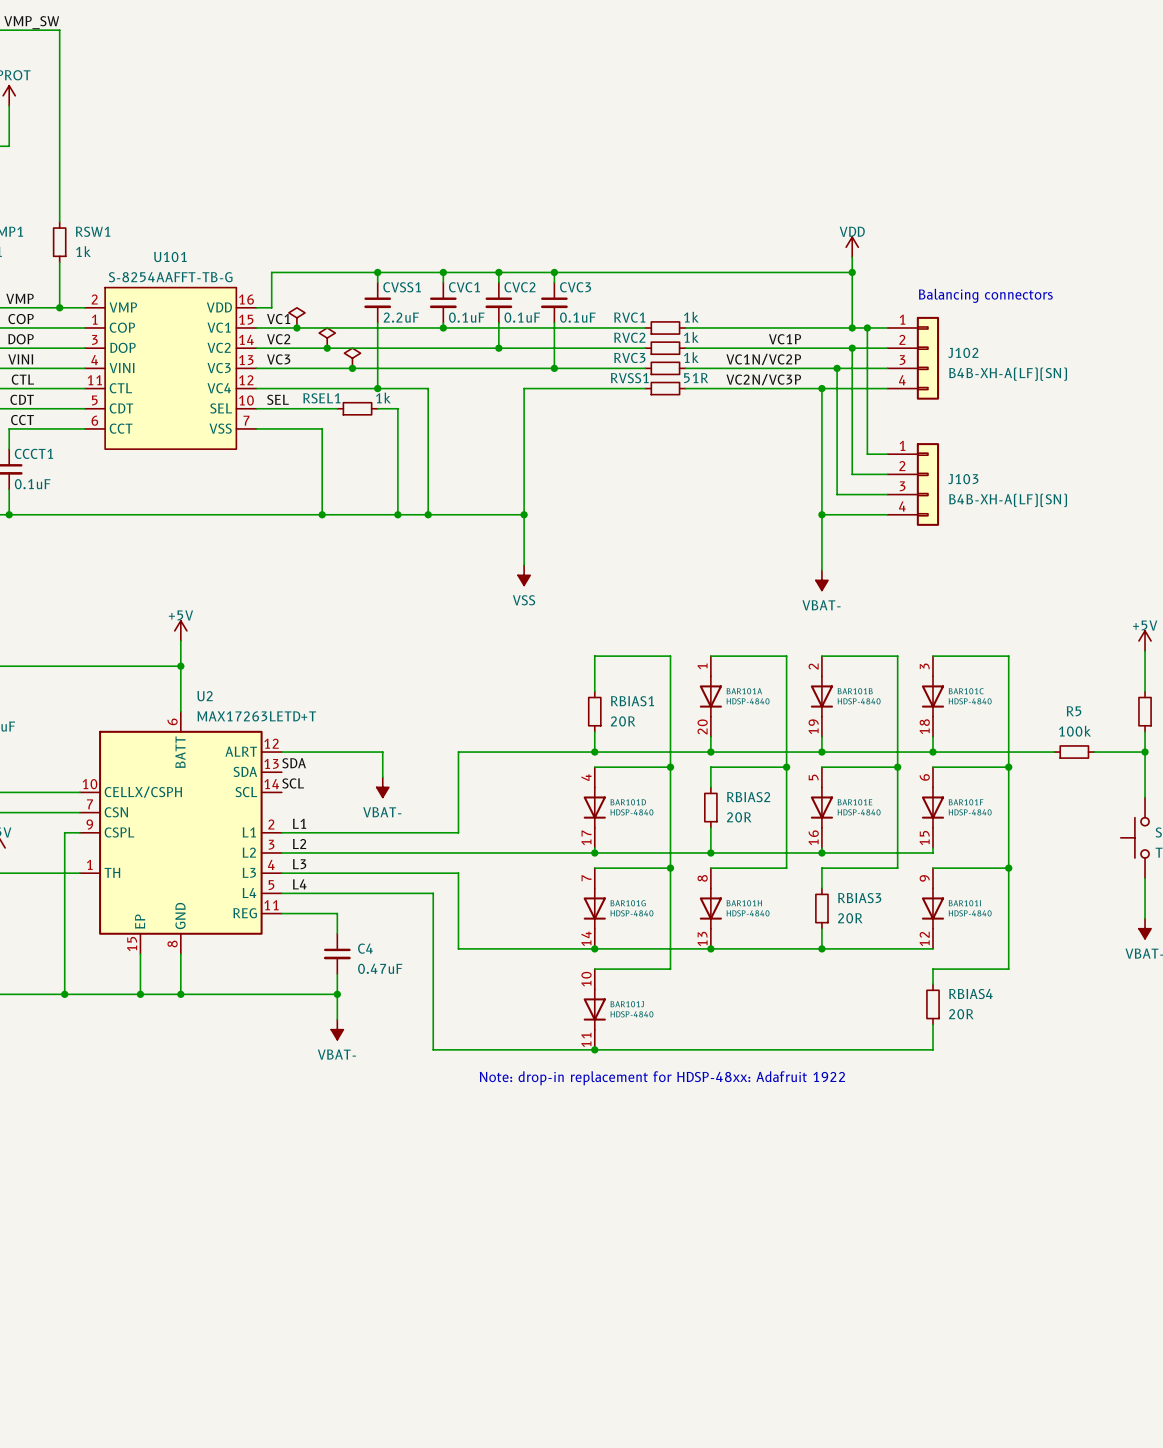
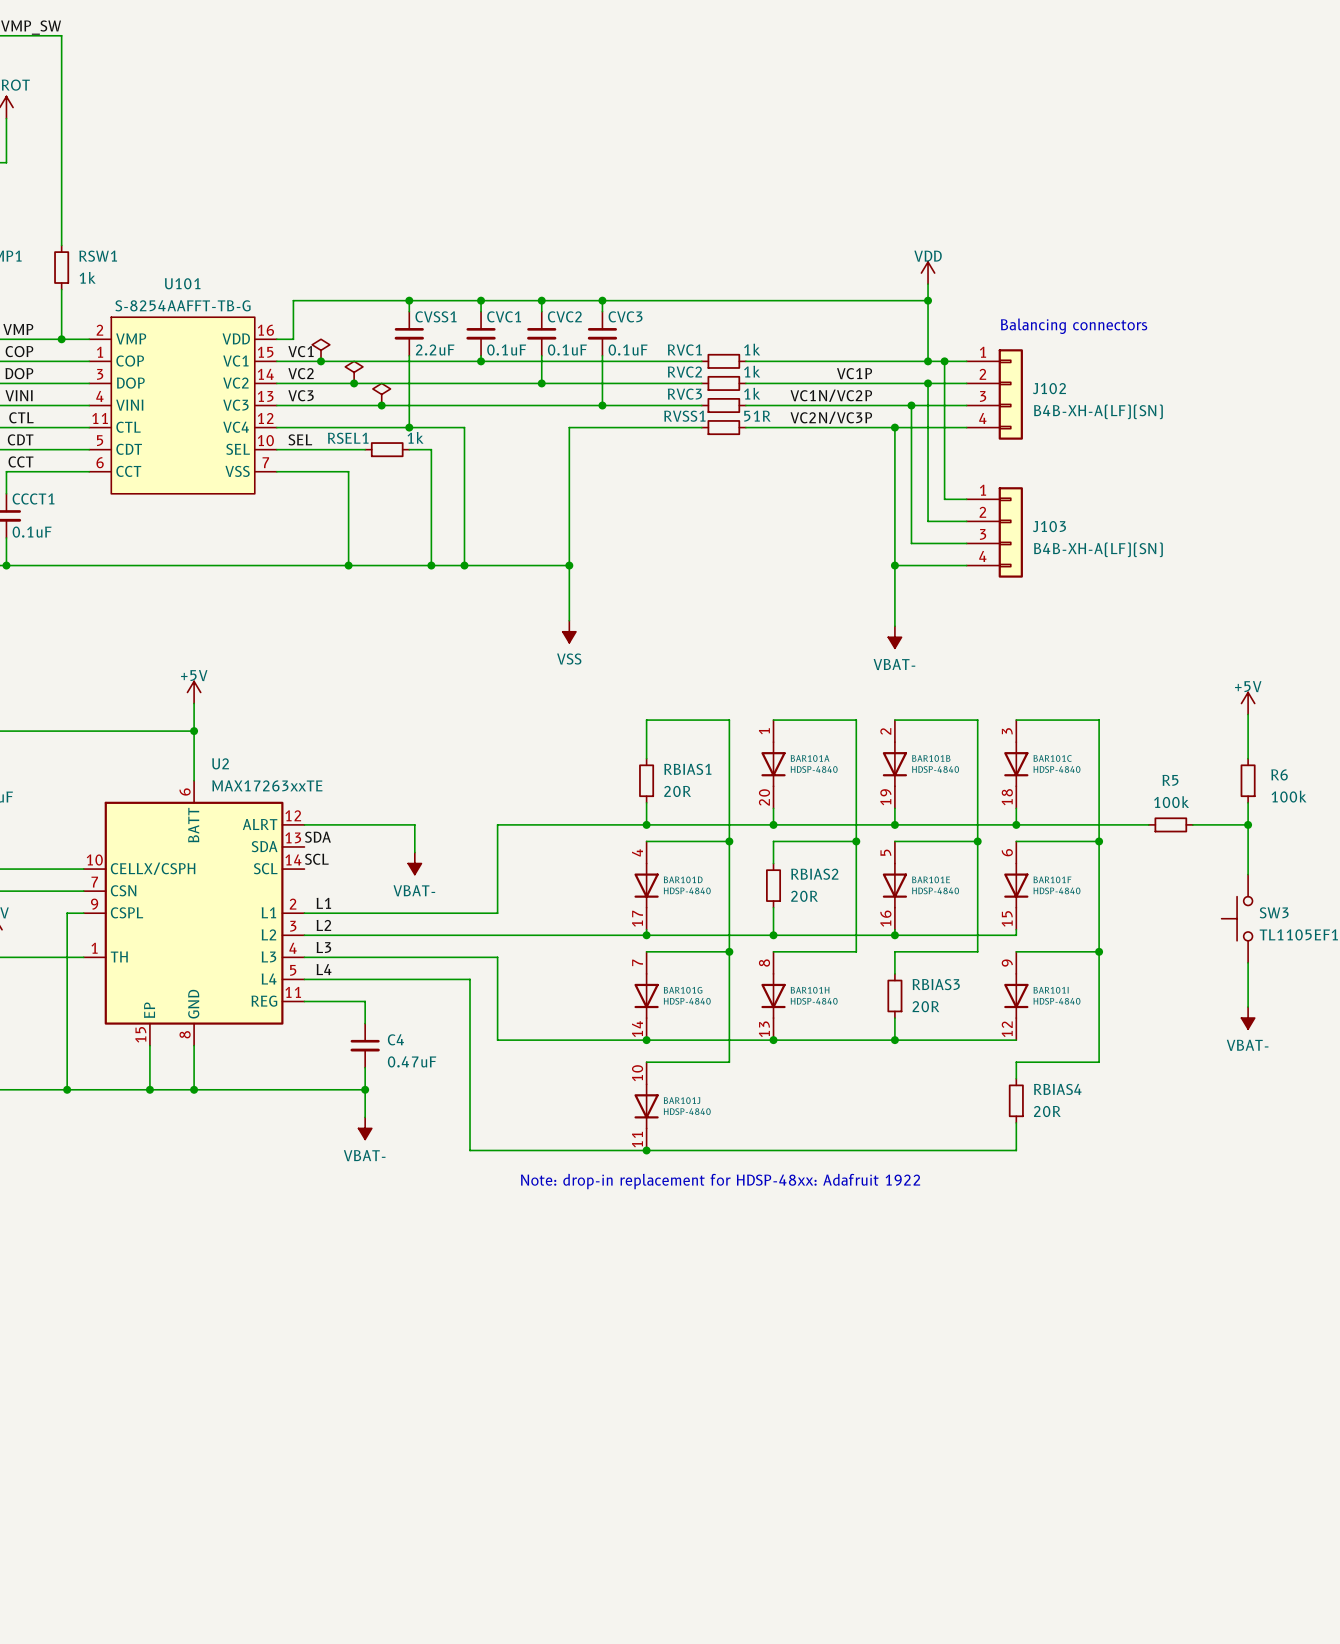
U2 value: MAX17263LETD+T (256, 716) -> MAX17263xxTE (267, 785)

